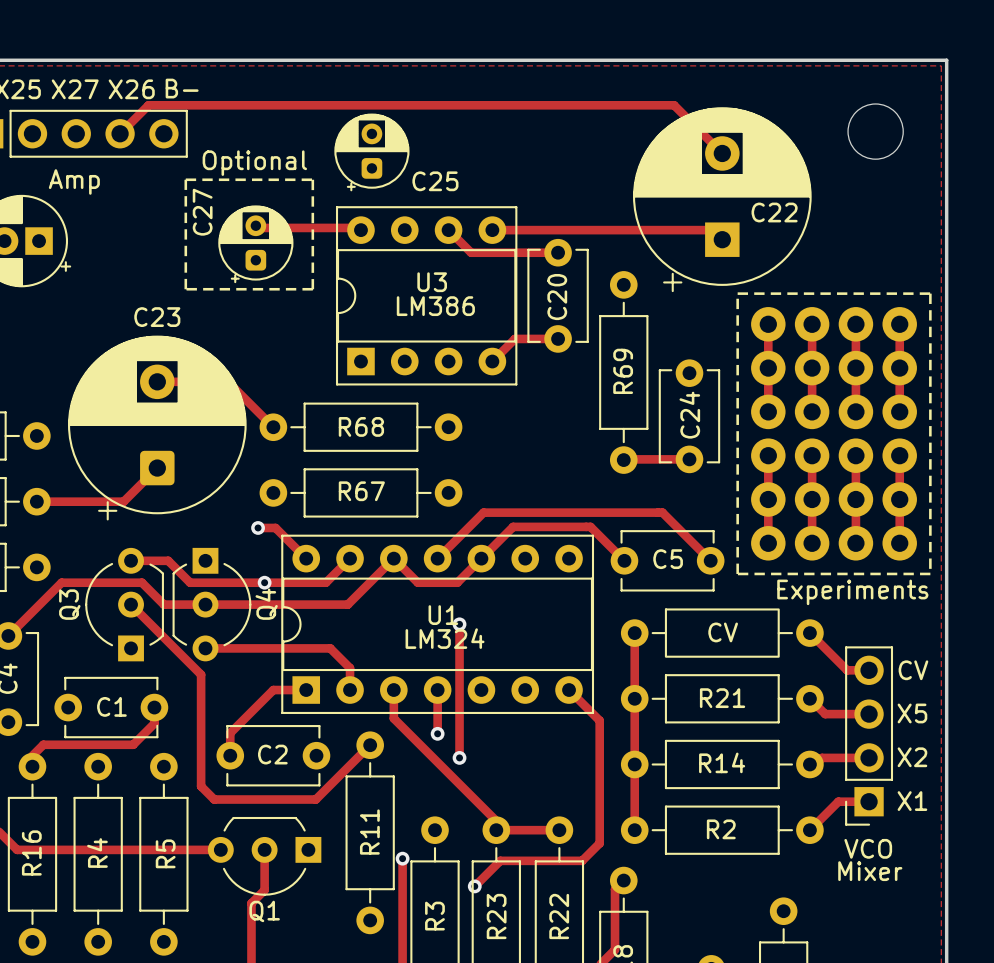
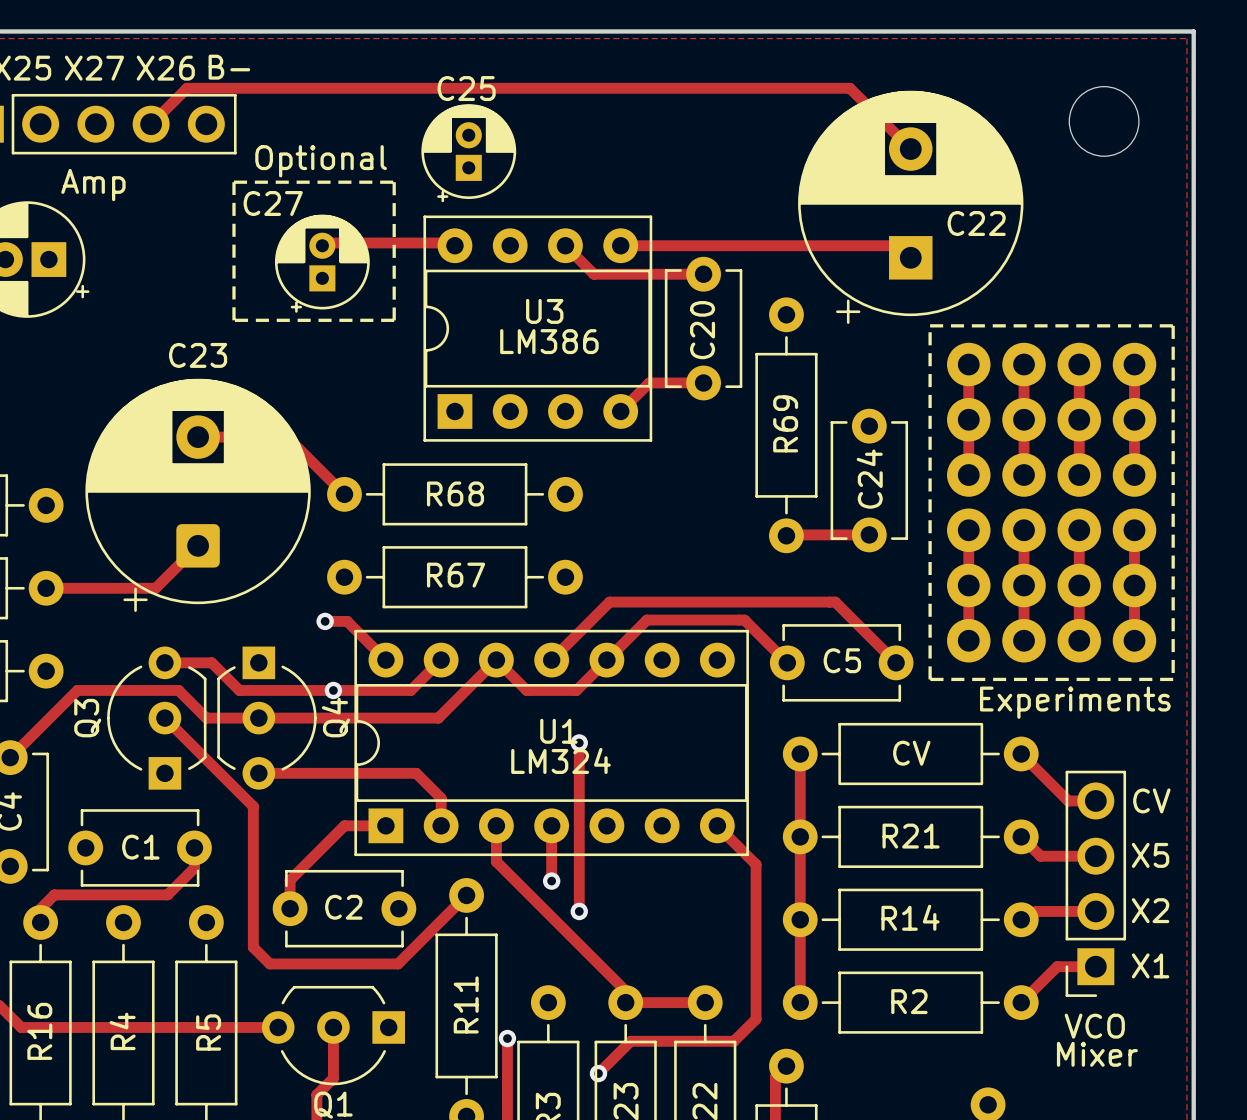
C25 footprint: [334, 113, 410, 192] -> [421, 104, 517, 203]
C25 name position: C25 (435, 181) -> C25 (466, 88)
C27 footprint: [218, 205, 294, 284] -> [274, 214, 370, 313]
C27 name rotation: 0° (202, 212) -> 90° clockwise (273, 203)

